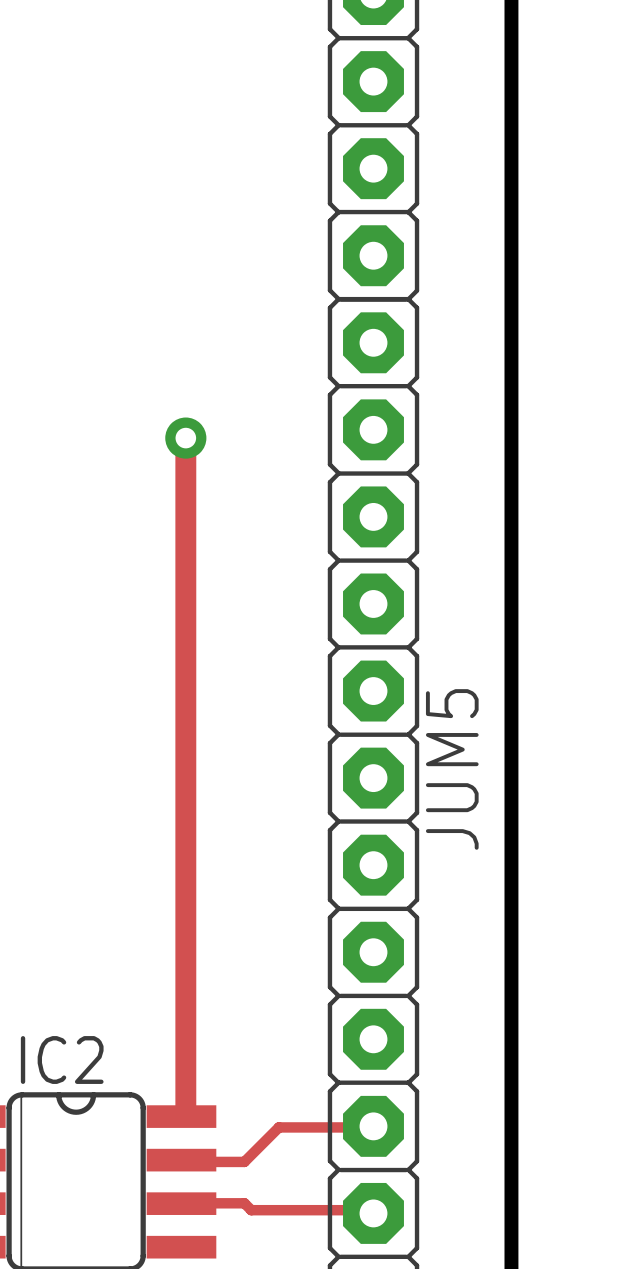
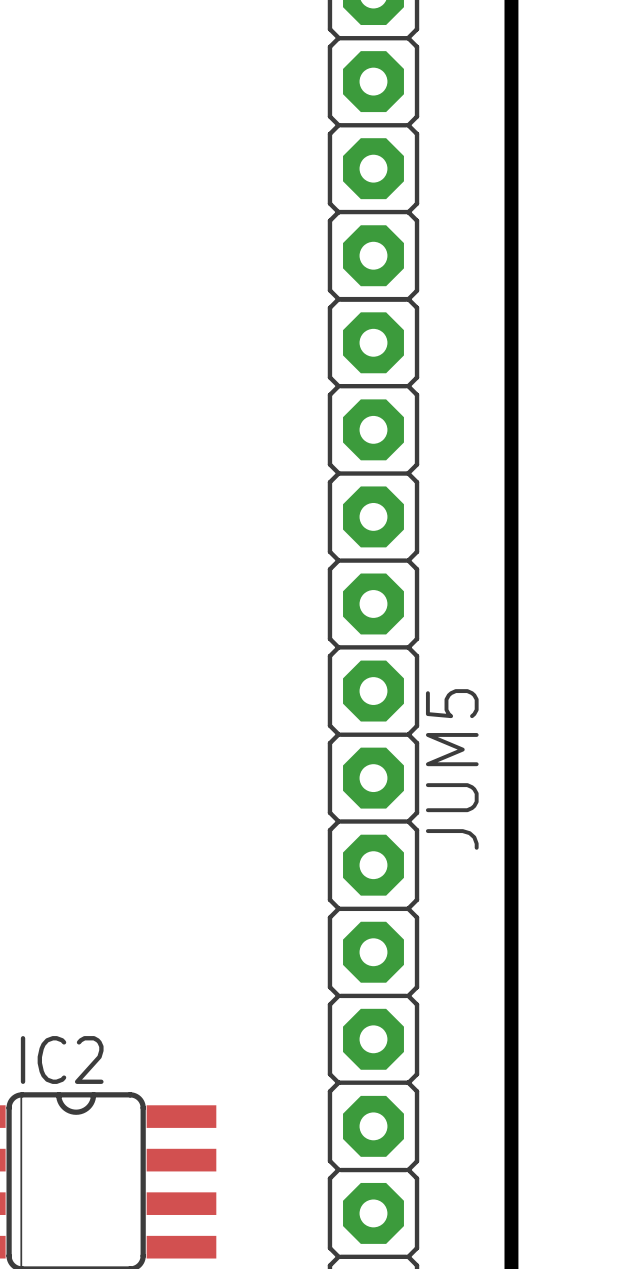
track: (185, 438) (185, 1115) (181, 1116) -> none
via: (185, 438) -> none
track: (373, 1126) (278, 1127) (244, 1161) (182, 1161) (181, 1160) -> none
track: (181, 1203) (244, 1203) (251, 1210) (368, 1210) (373, 1213) -> none

